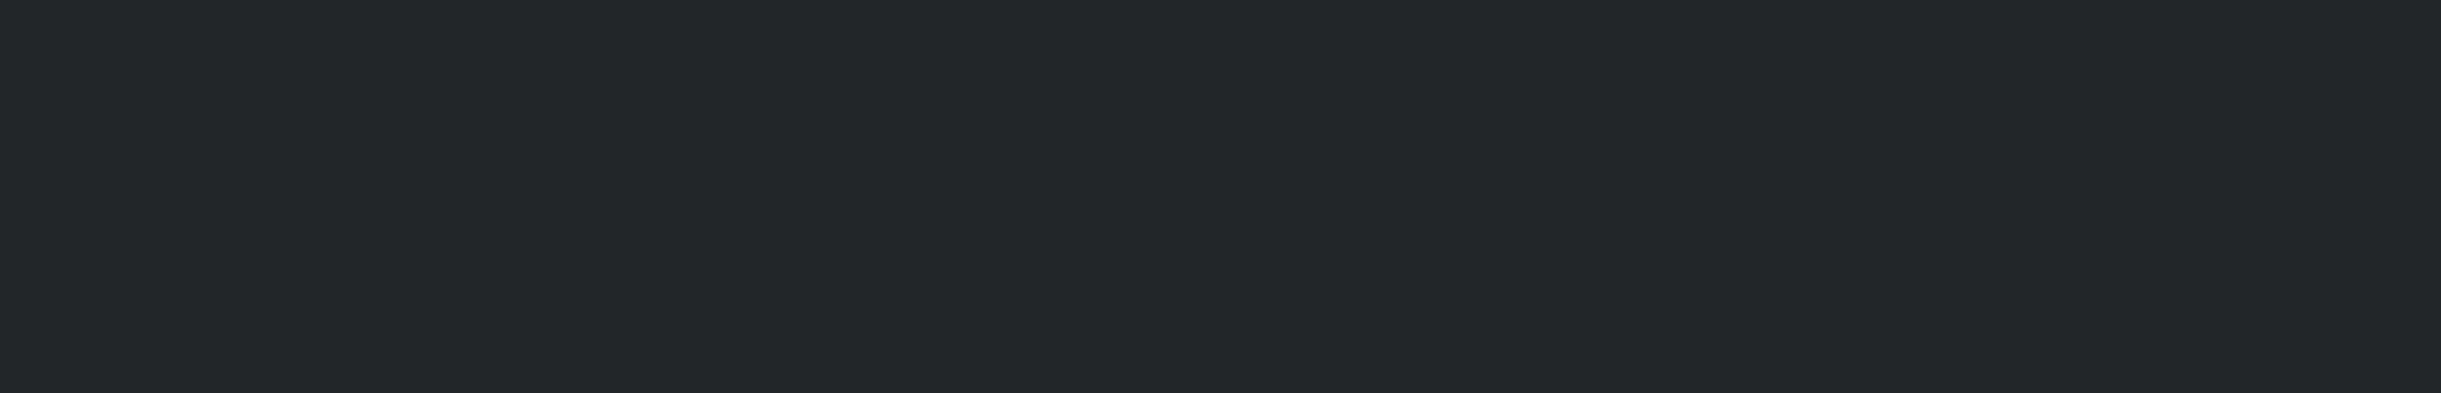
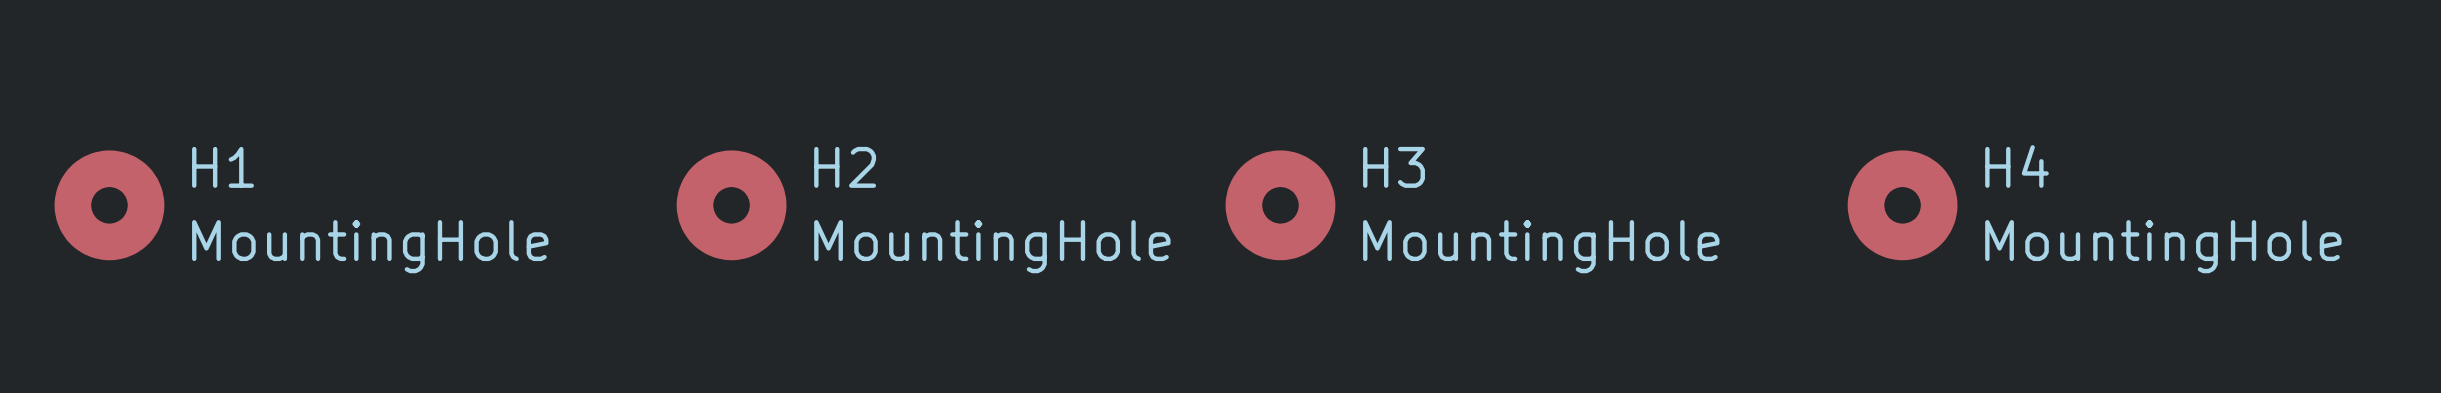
H1: none -> MountingHole (109, 205)
H2: none -> MountingHole (731, 205)
H3: none -> MountingHole (1280, 205)
H4: none -> MountingHole (1902, 205)

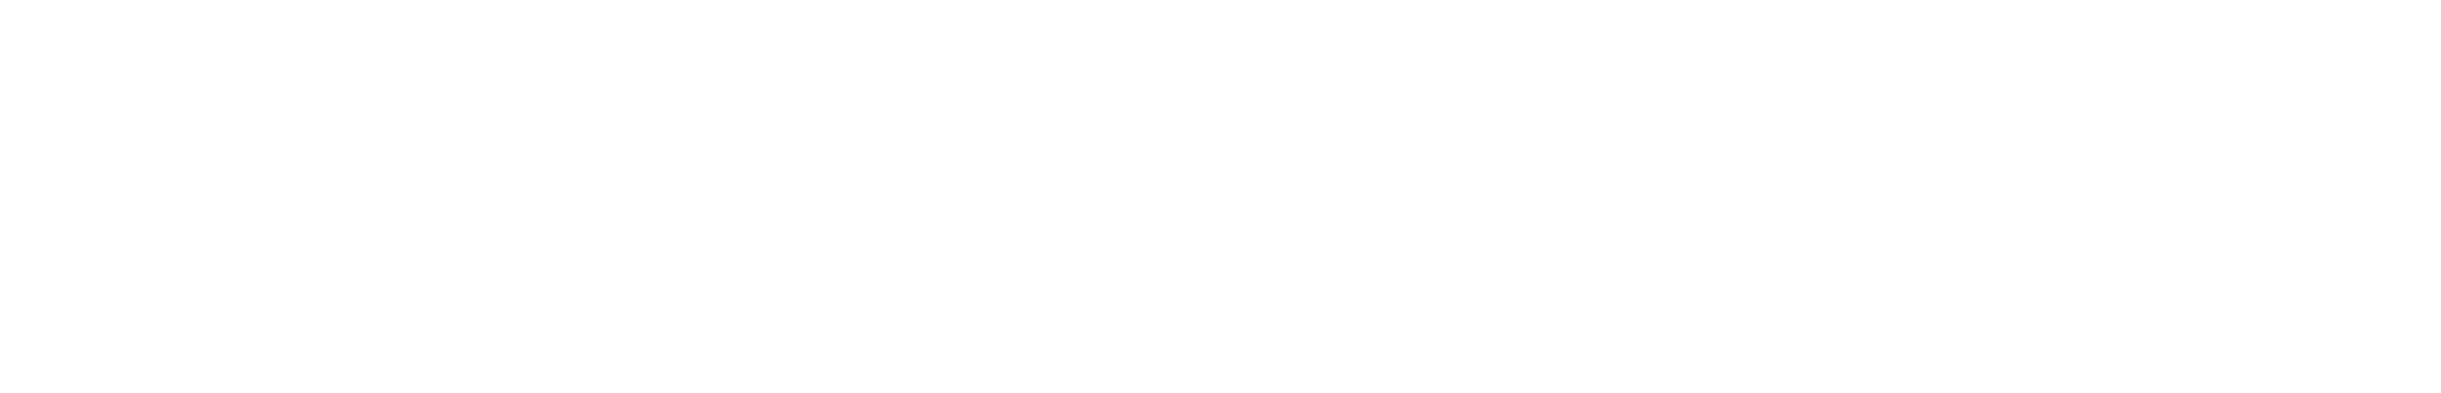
H1: MountingHole (109, 205) -> none
H2: MountingHole (731, 205) -> none
H3: MountingHole (1280, 205) -> none
H4: MountingHole (1902, 205) -> none

